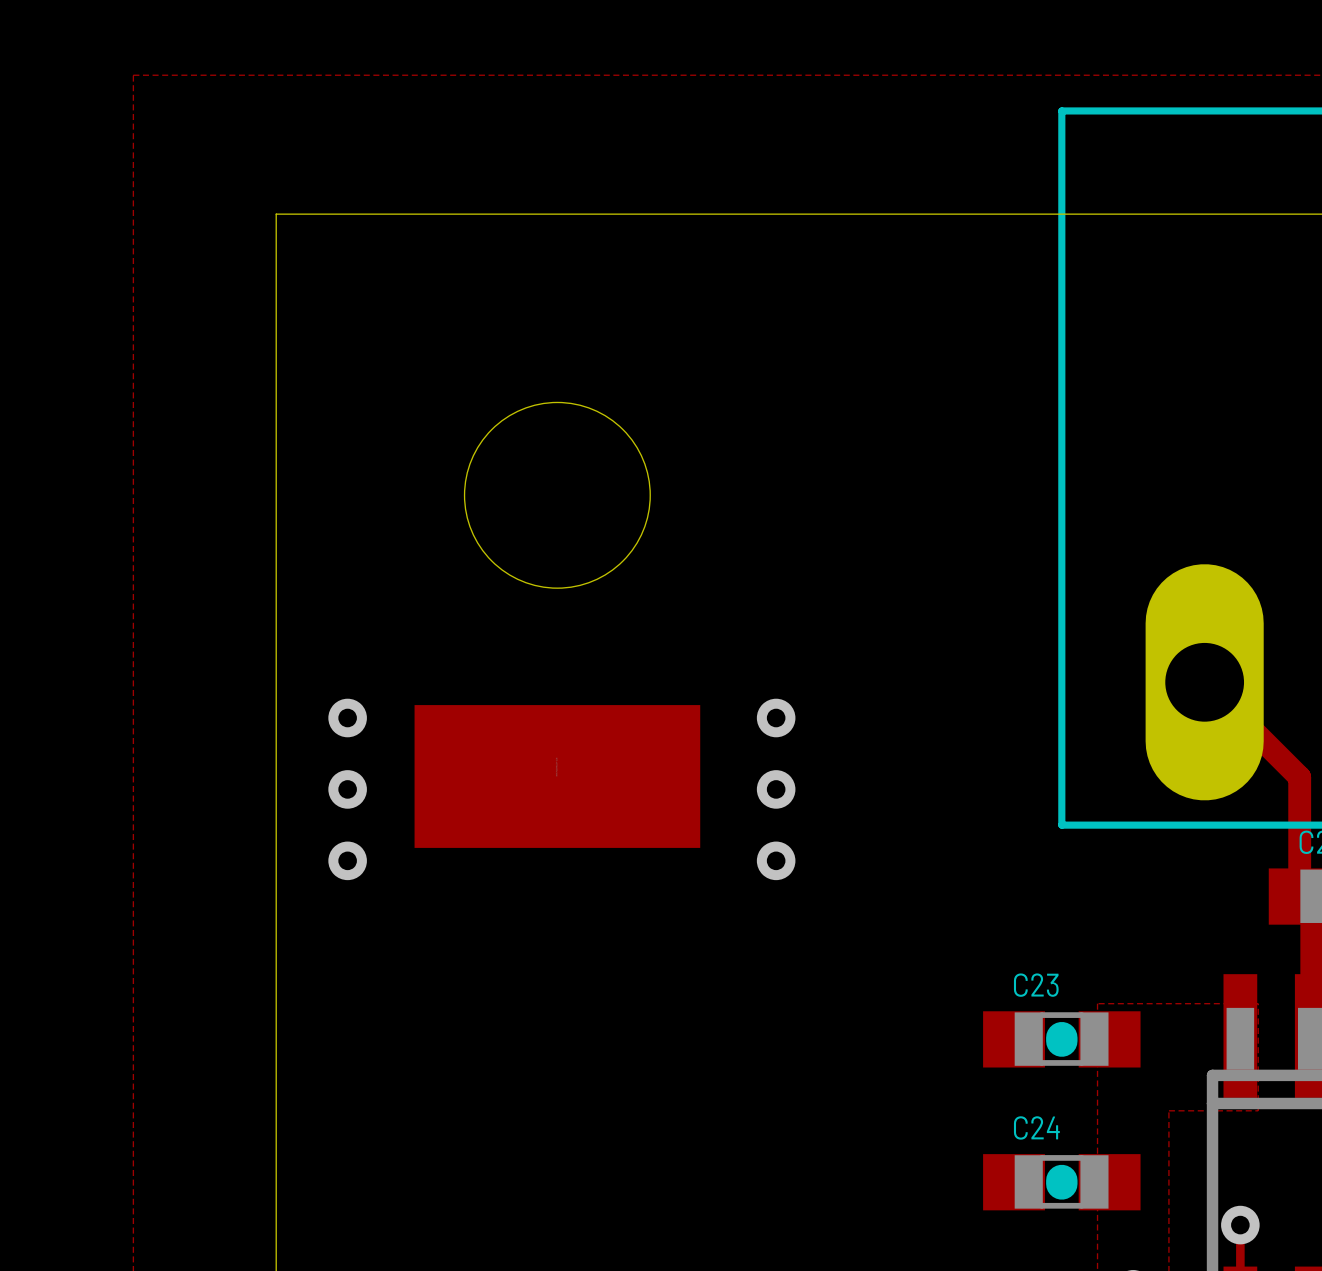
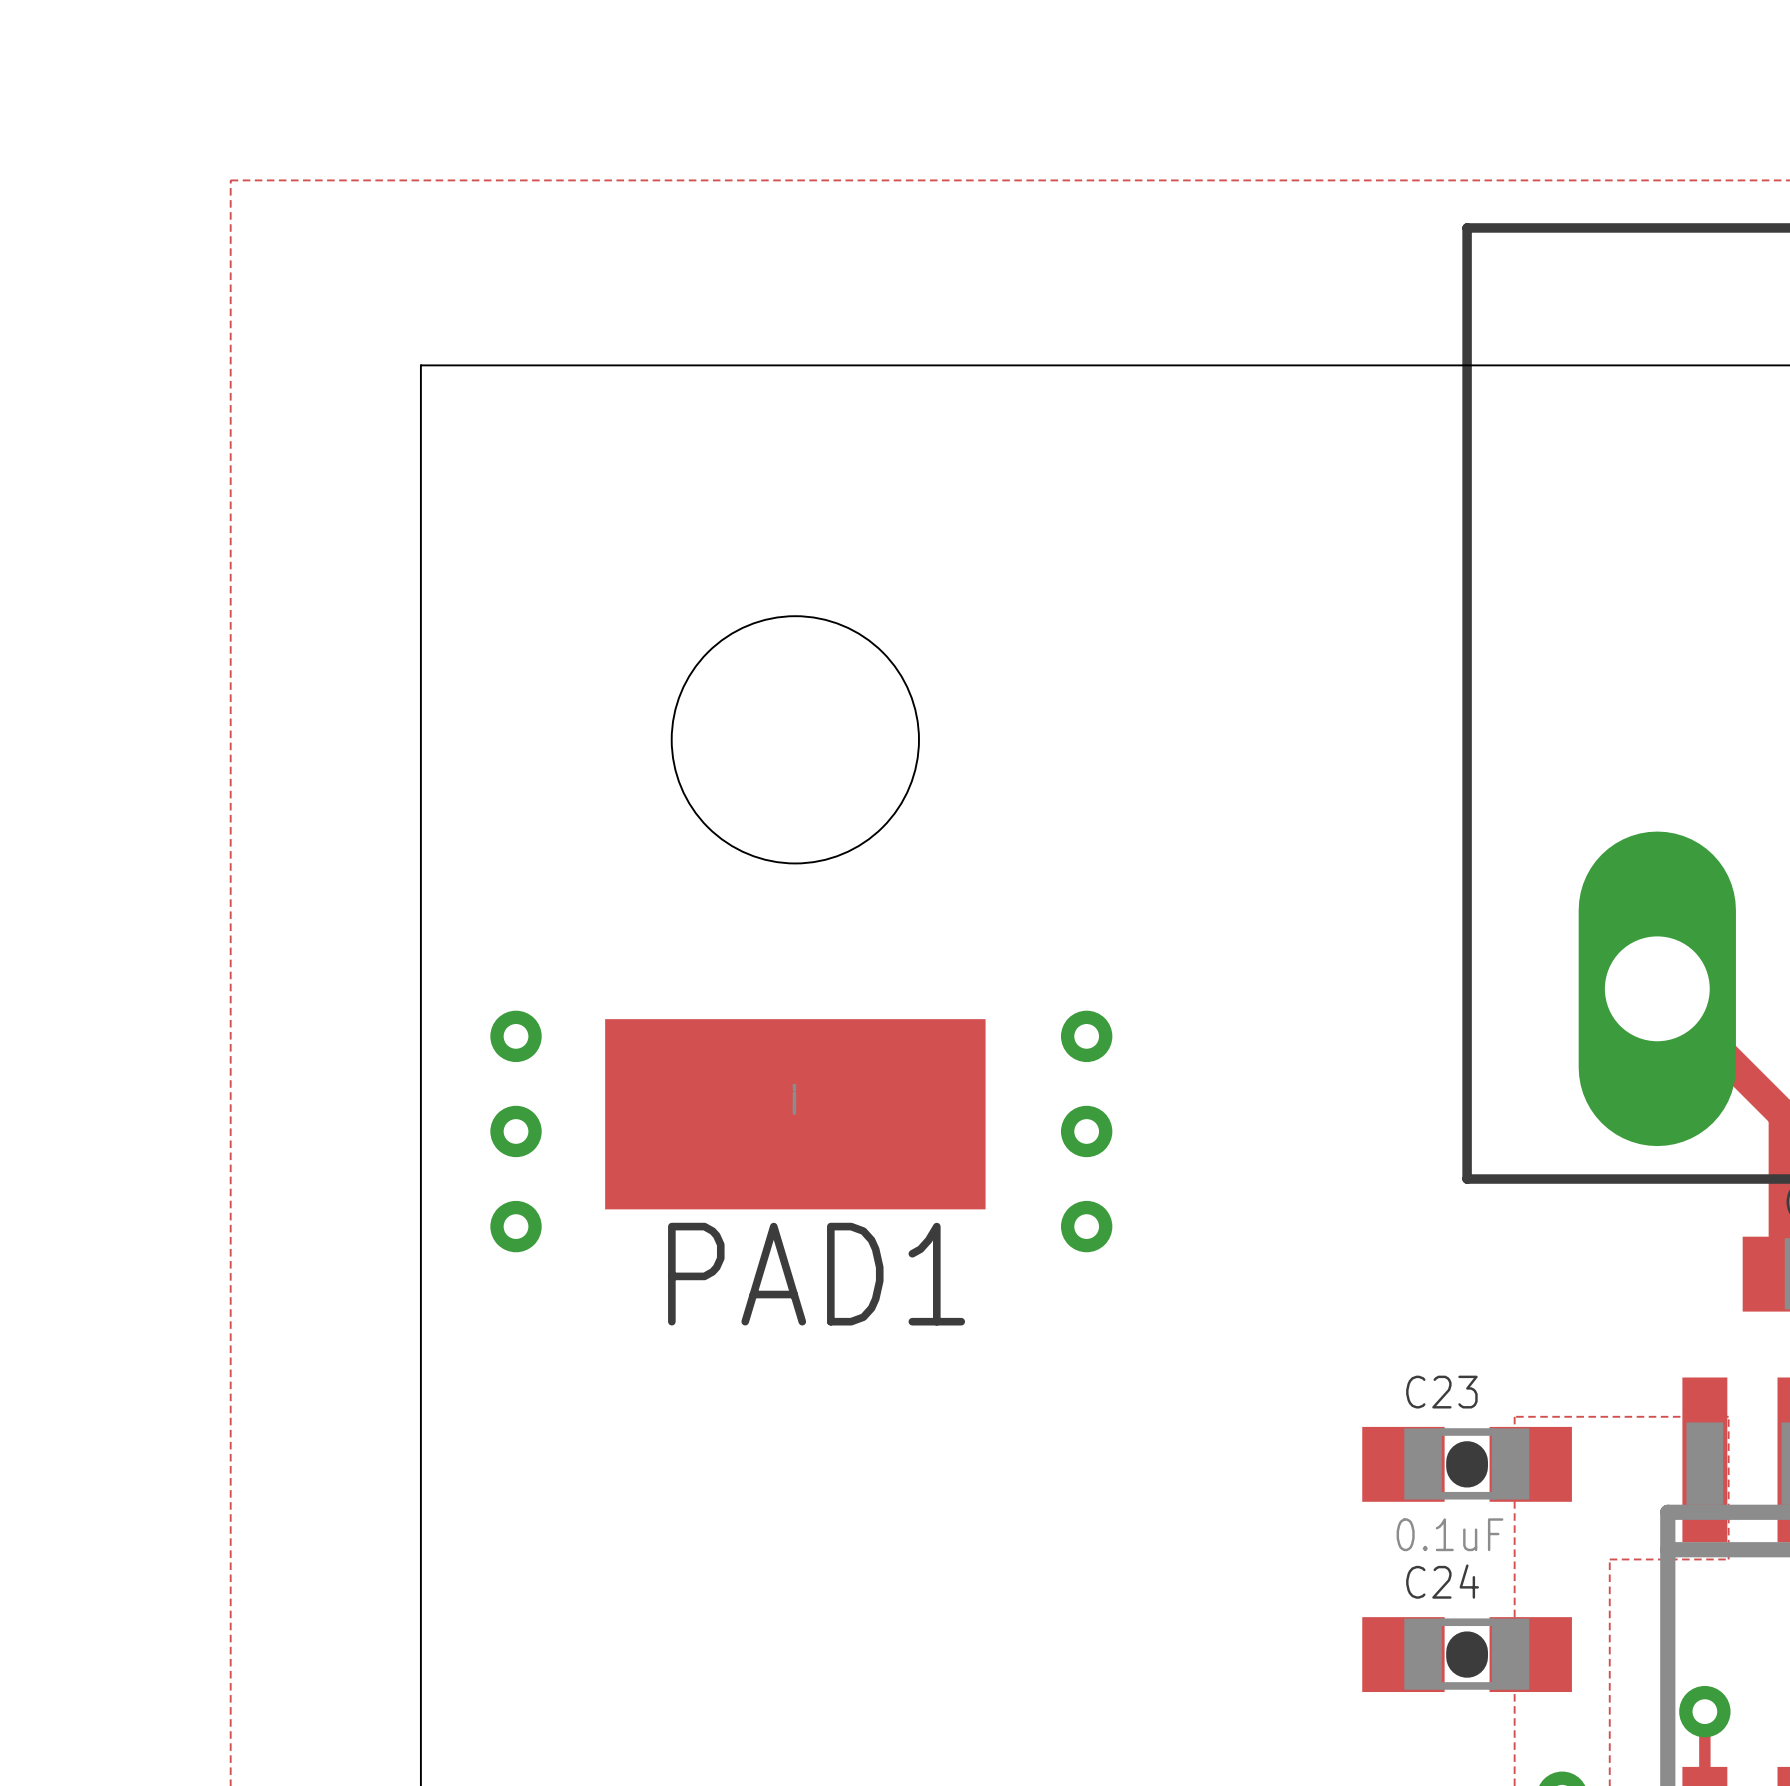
PAD1 name: none -> PAD1 (816, 1274)
C23 value: none -> 0.1uF (1450, 1534)

